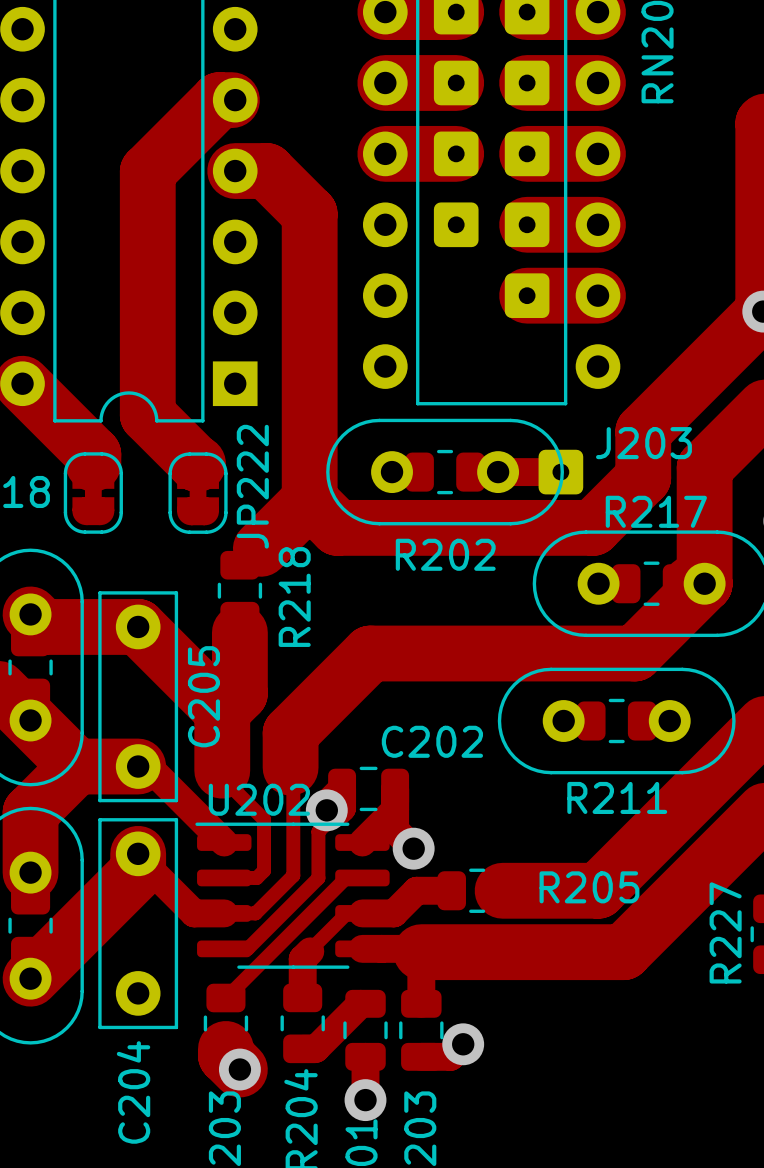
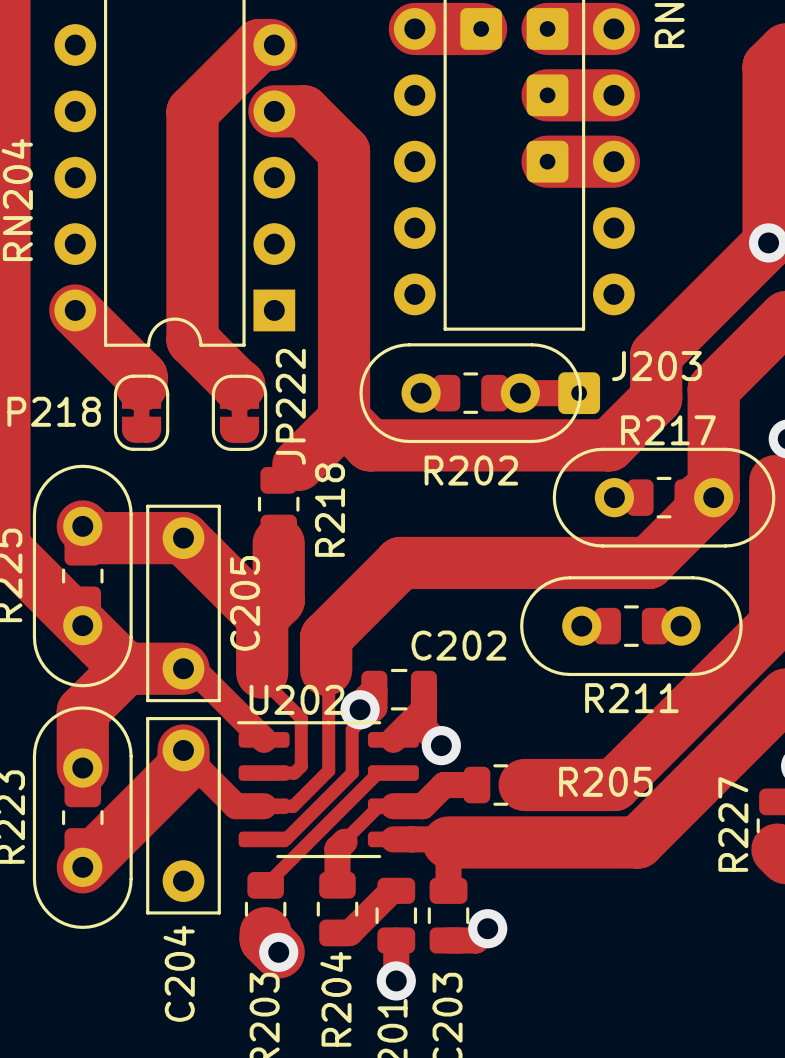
track: (385, 153) (456, 153) -> none
part: (456, 153) -> none
part: (456, 224) -> none
track: (527, 295) (598, 295) -> none
part: (527, 295) -> none

